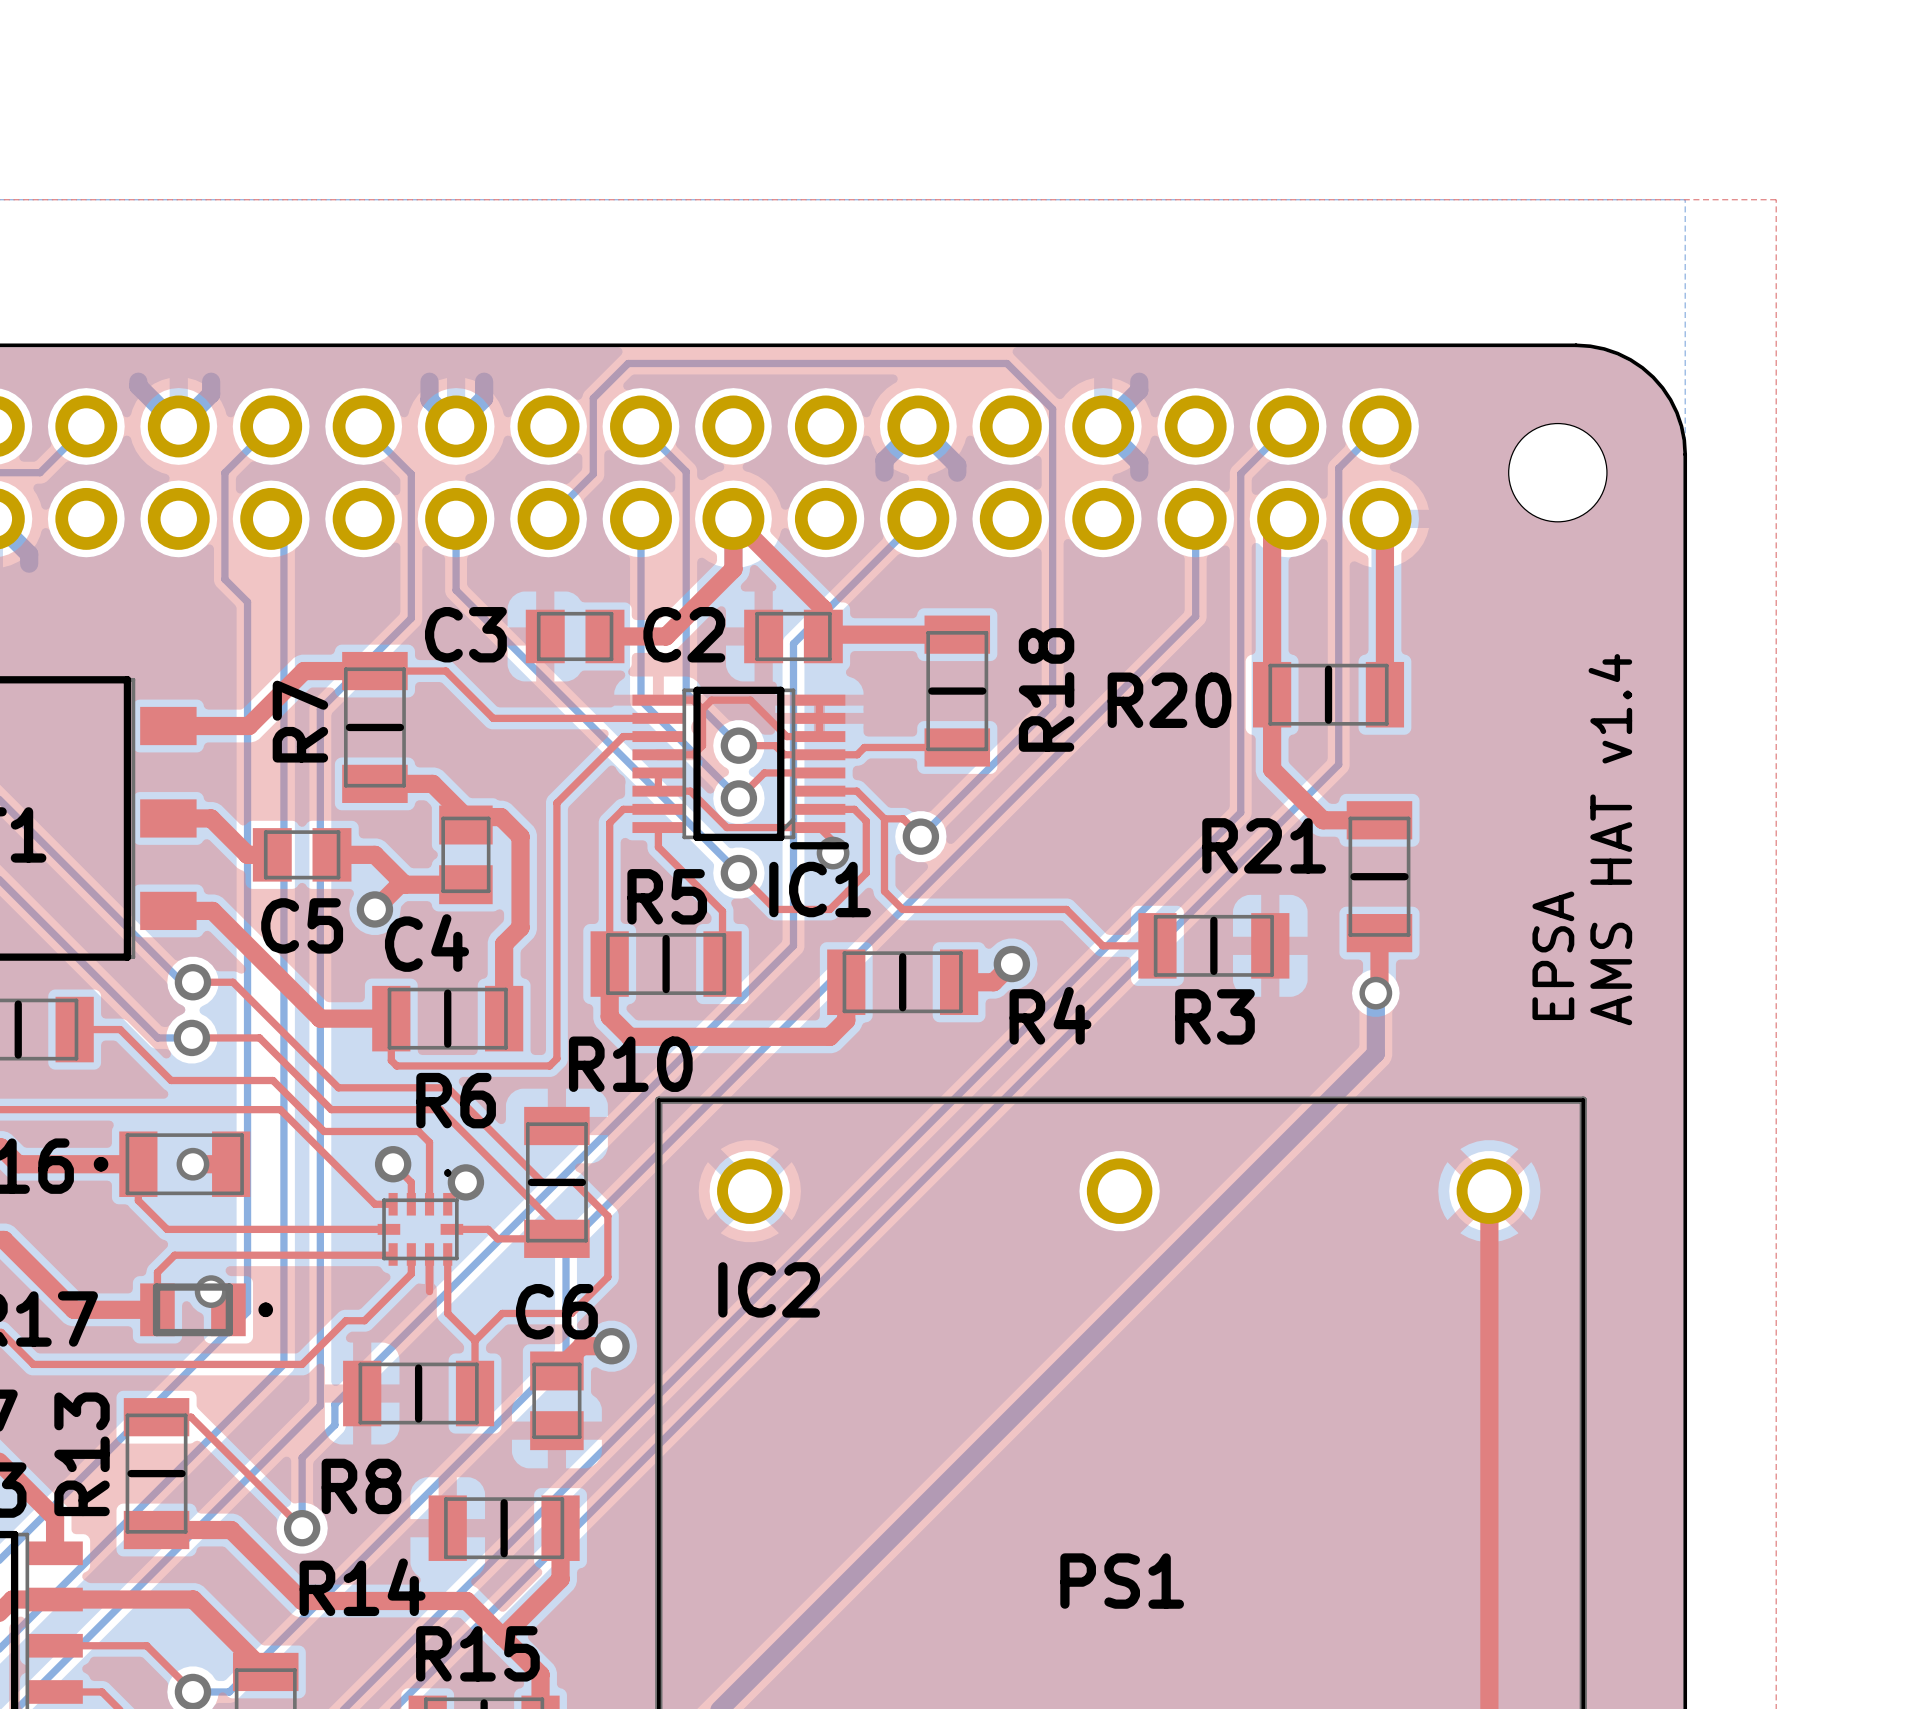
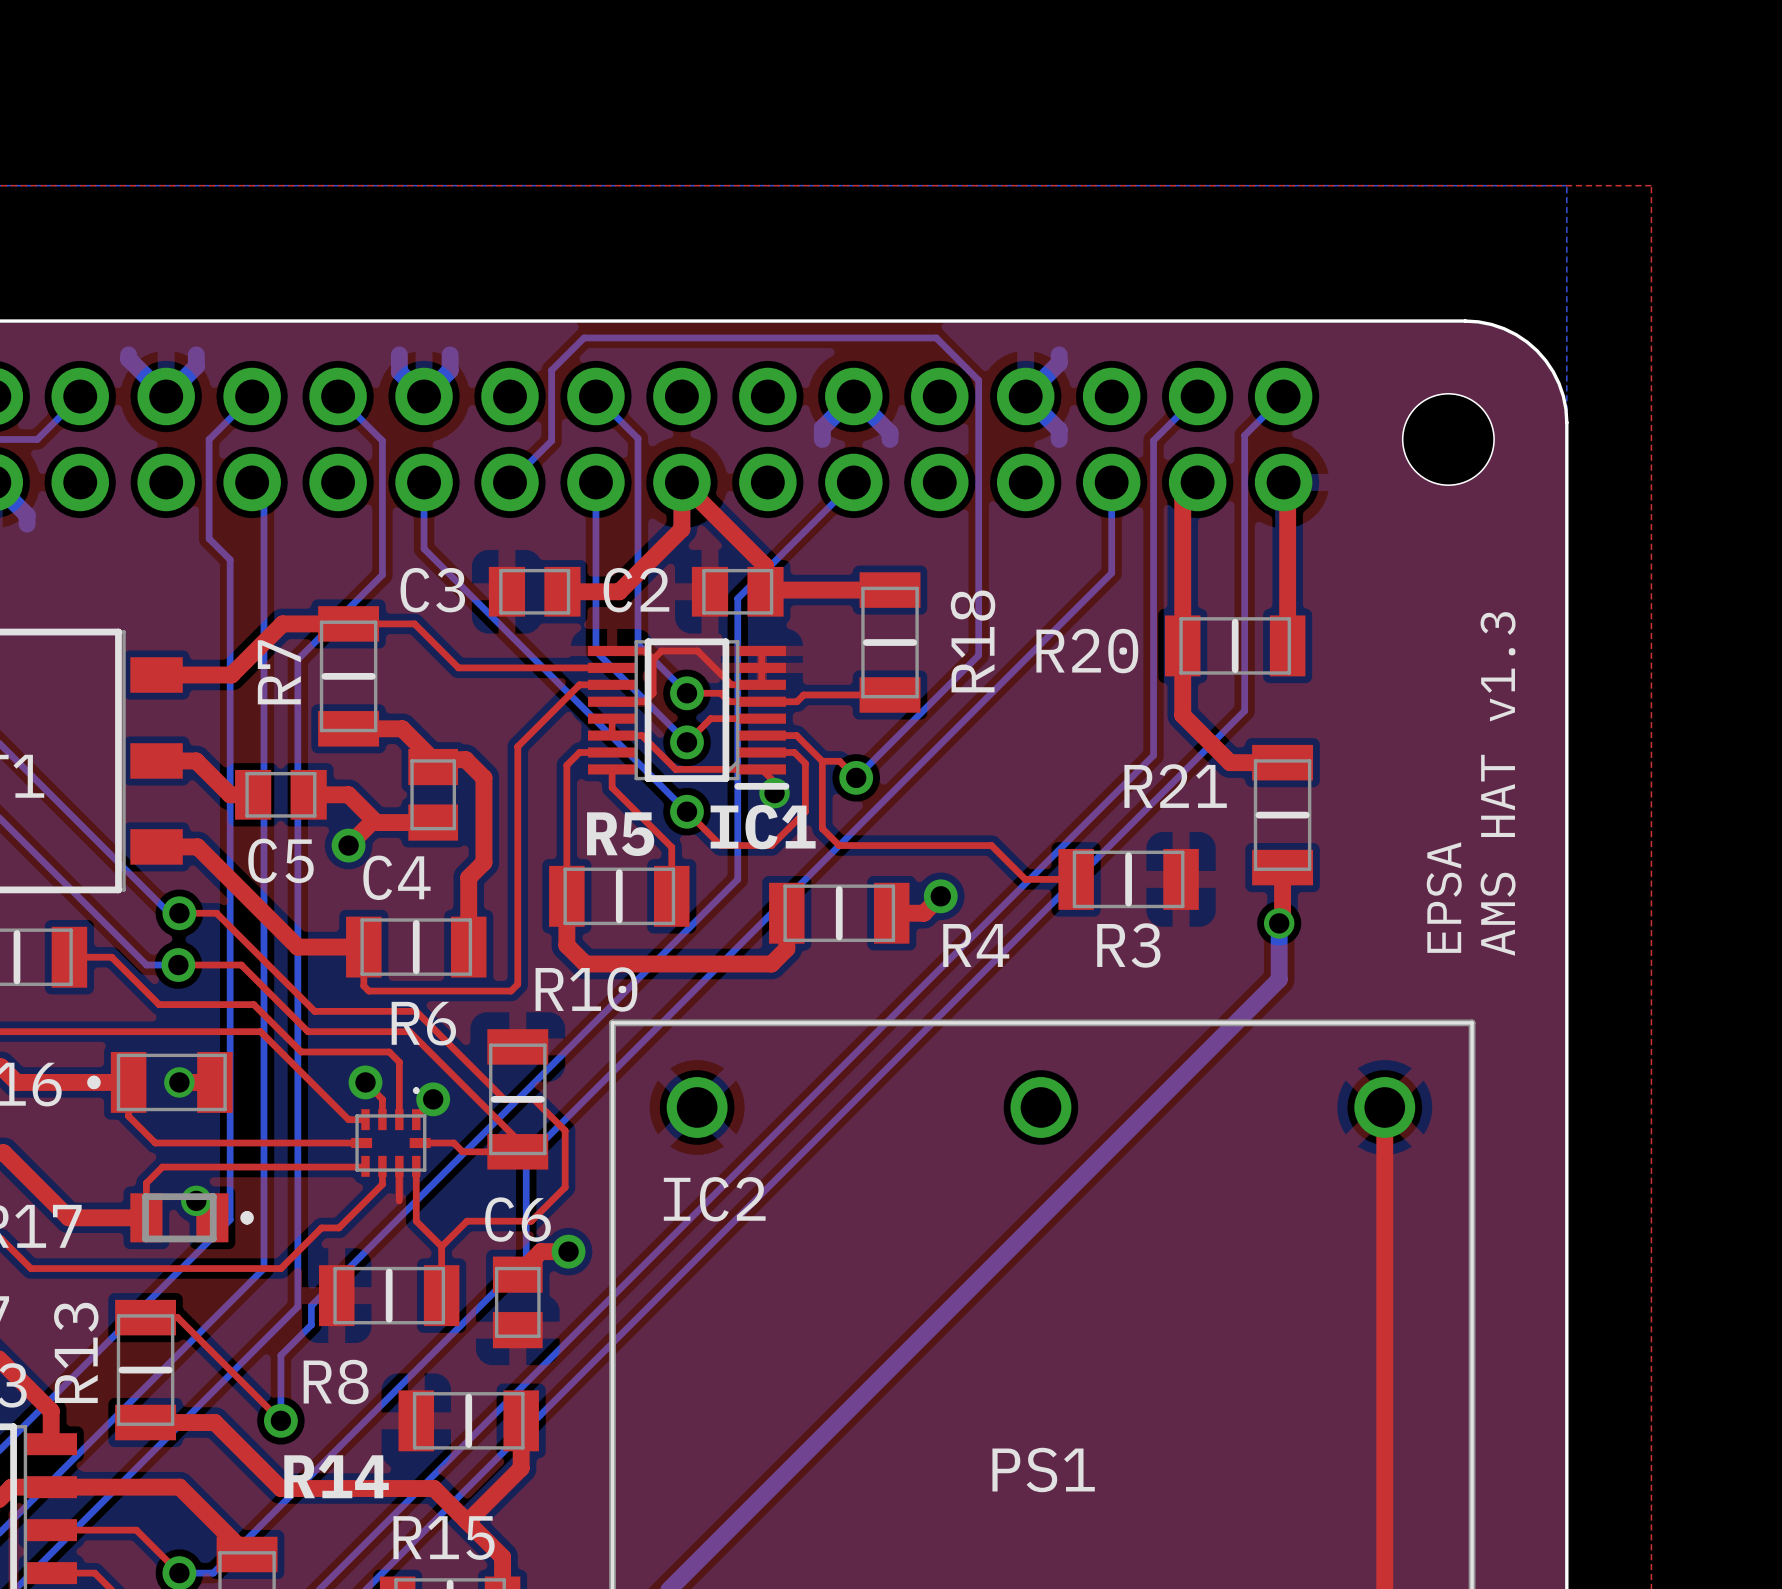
text: AMS HAT v1.4 (1610, 839) -> AMS HAT v1.3 (1498, 783)

